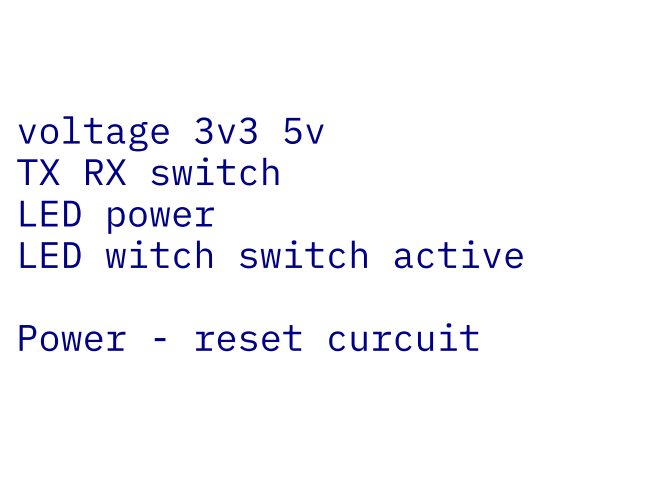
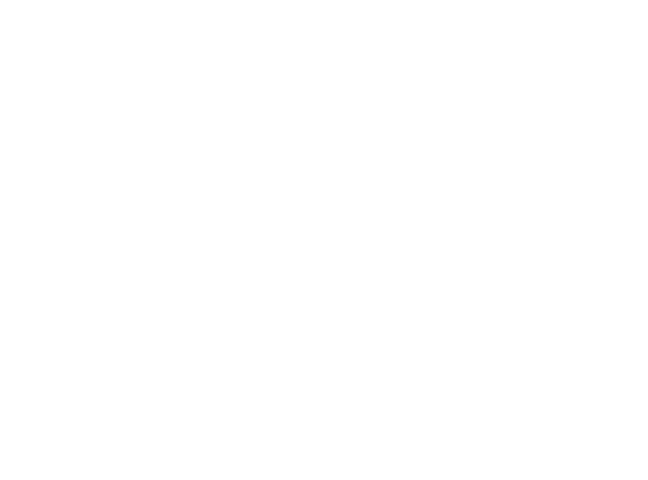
text: voltage 3v3 5v (171, 133) -> none
text: TX RX switch (147, 171) -> none
text: LED power (117, 217) -> none
text: LED witch switch active (271, 254) -> none
text: Power - reset curcuit (248, 337) -> none

